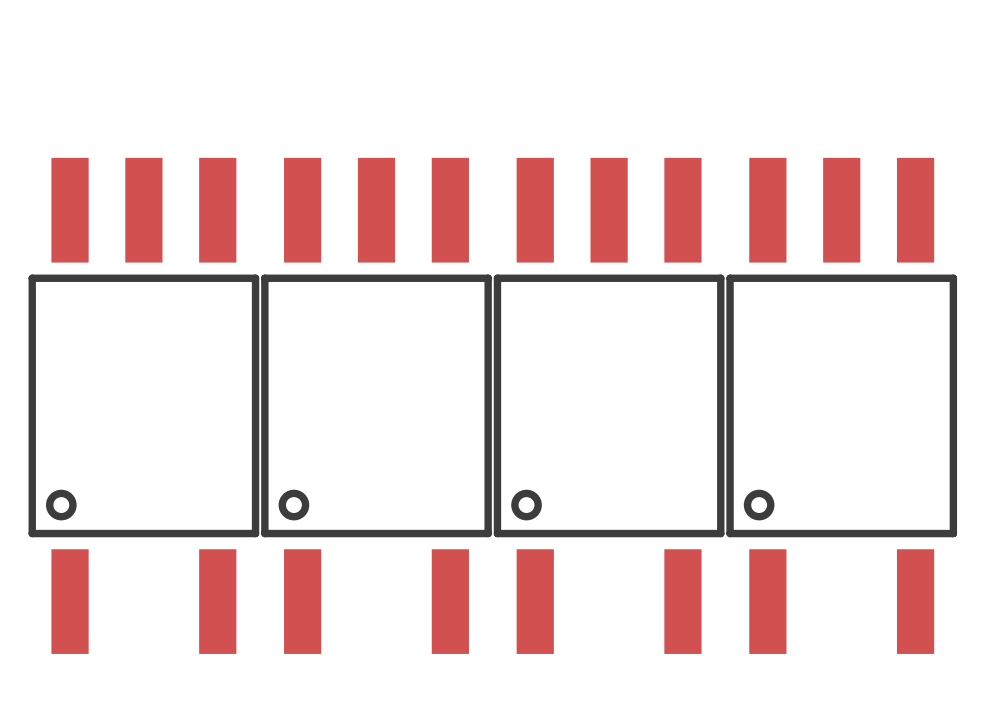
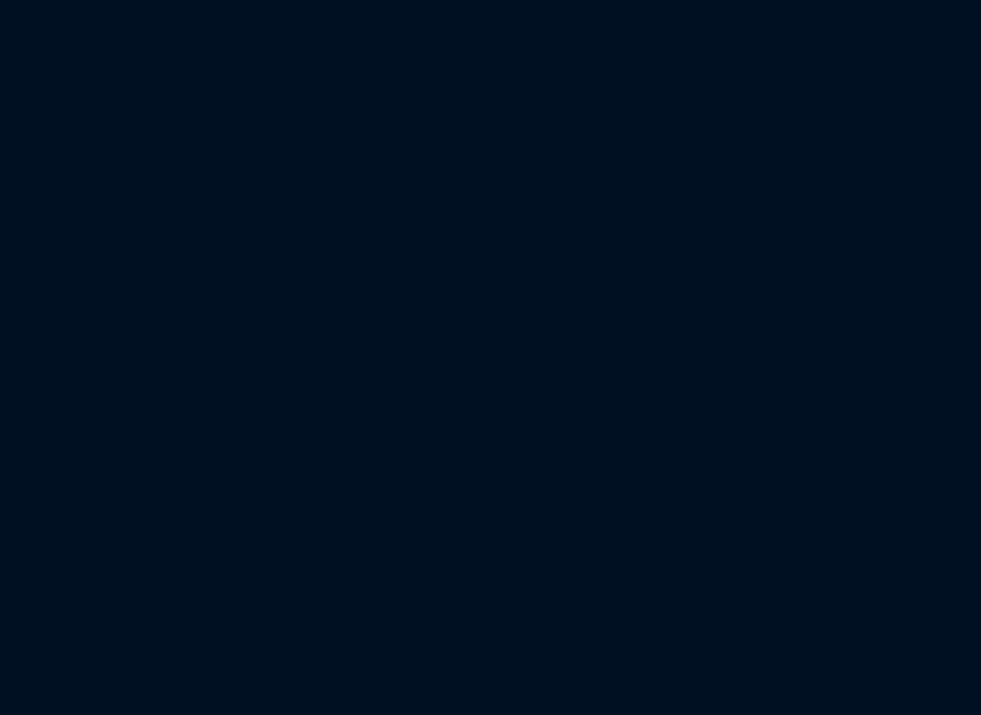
part: (143, 405) -> none
part: (376, 405) -> none
part: (609, 405) -> none
part: (841, 405) -> none

